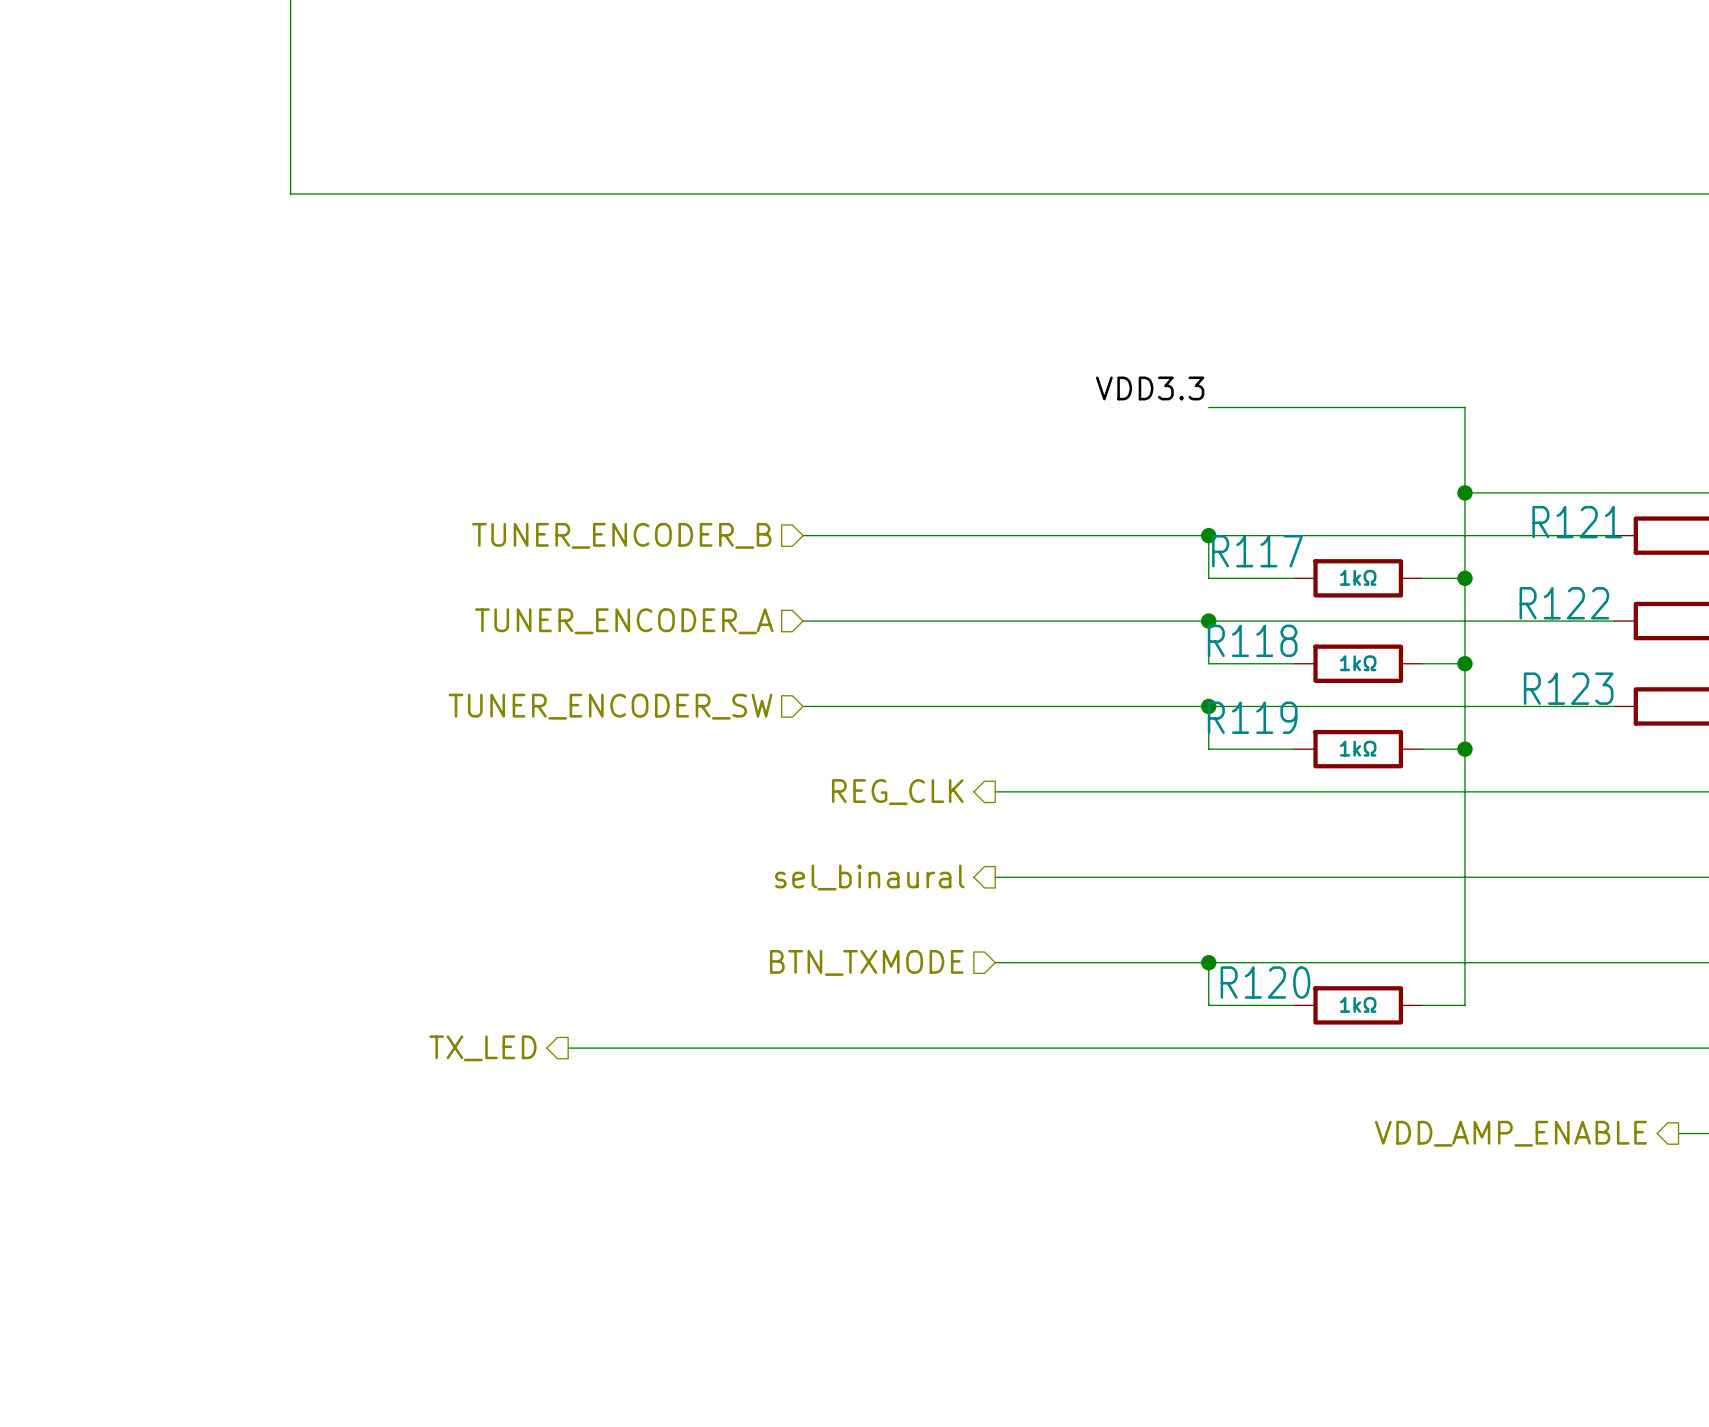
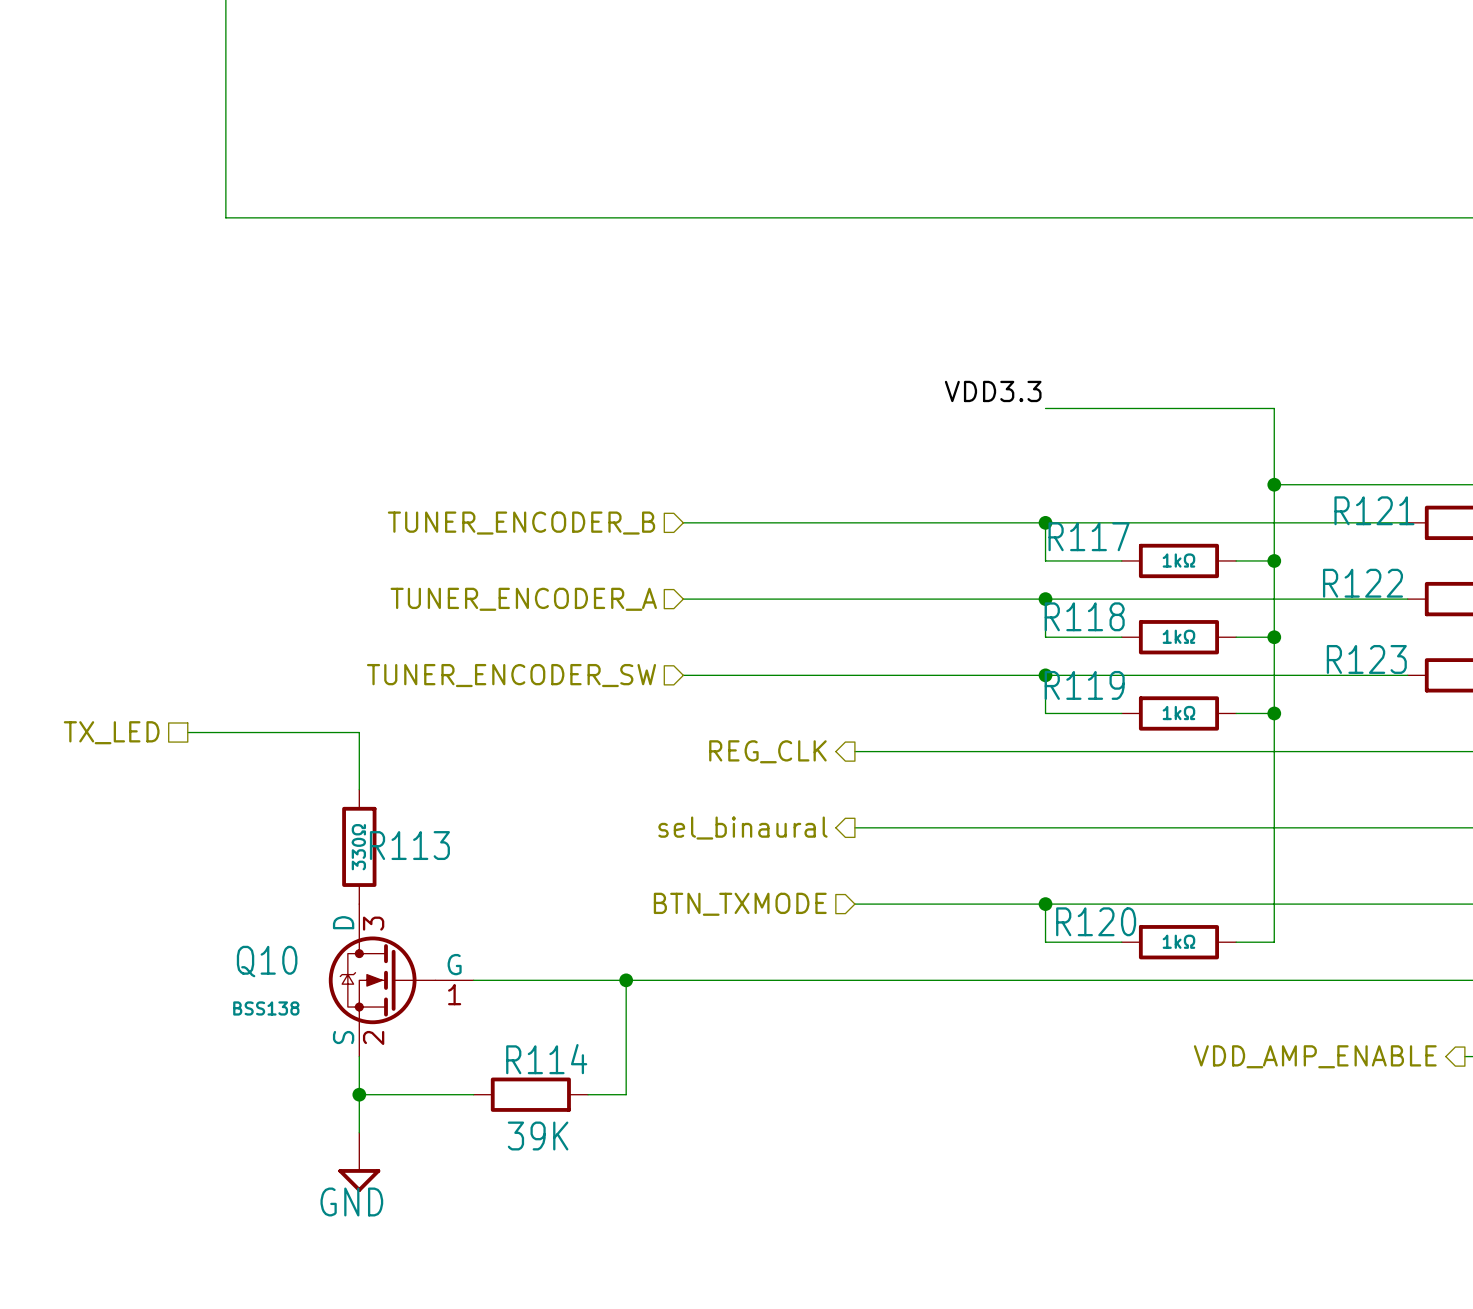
hierarchical label: none -> TX_LED (111, 732)
wire: none -> (187, 732) (359, 732) (359, 789)
R113: none -> 330Ω (359, 846)
hierarchical label: TX_LED (482, 1048) -> none
Q10: none -> BSS138 (401, 980)
wire: none -> (626, 980) (626, 1094) (588, 1094)
junction: none -> (626, 980)
wire: none -> (359, 1056) (359, 1132)
wire: none -> (359, 1094) (473, 1094)
junction: none -> (359, 1094)
R114: none -> 39K (530, 1094)
power symbol: none -> GND (359, 1162)

